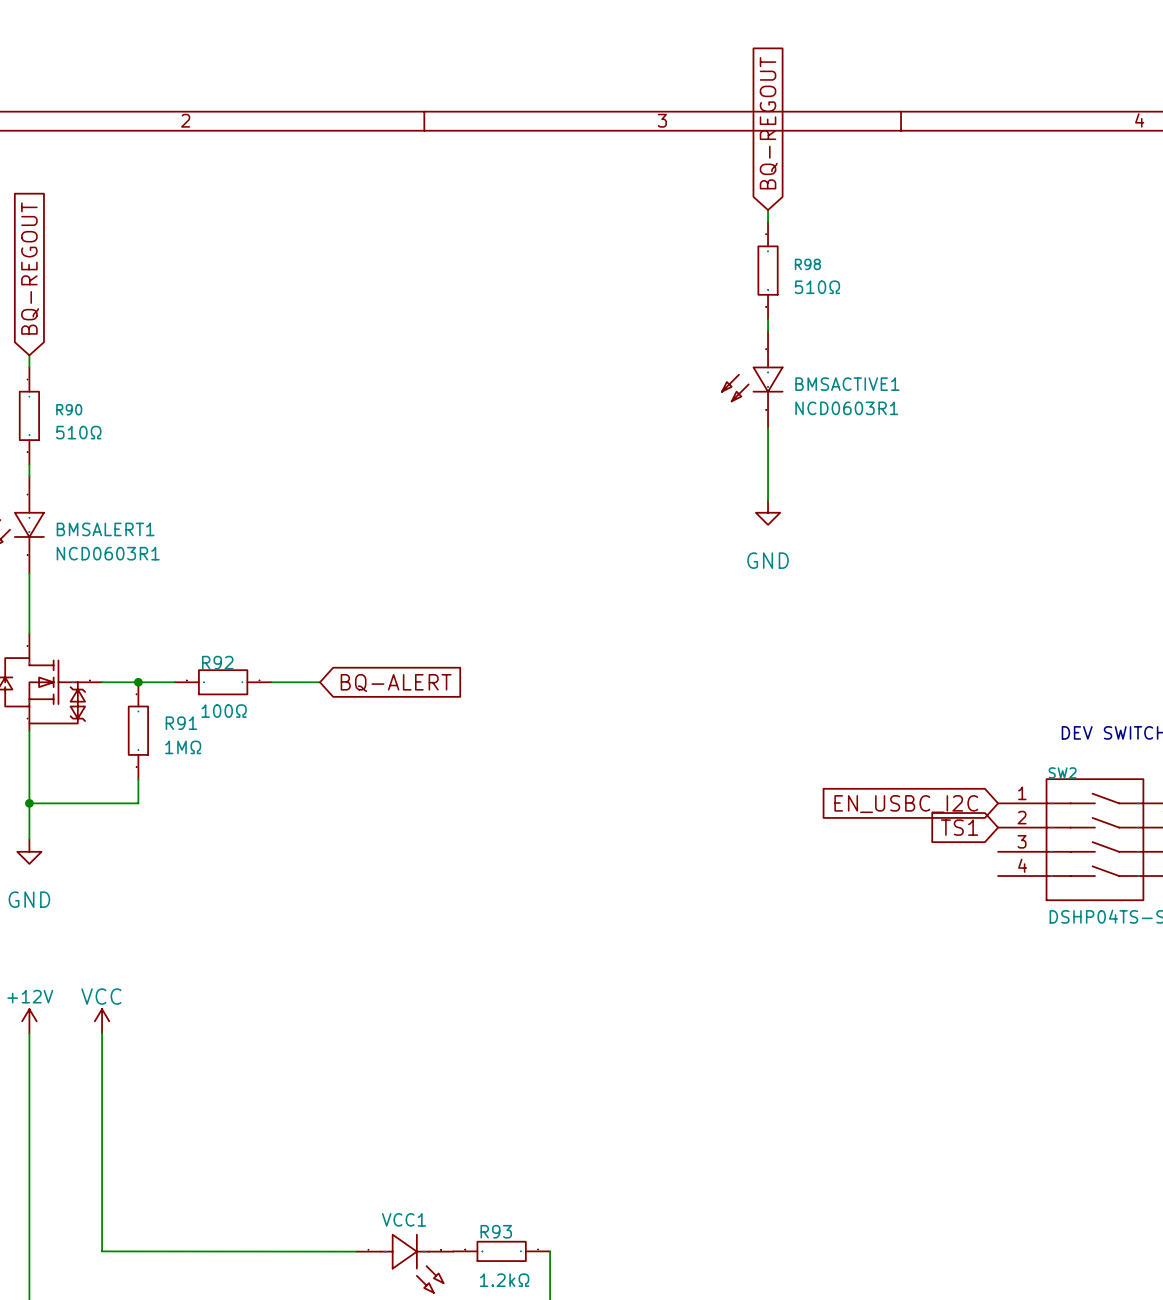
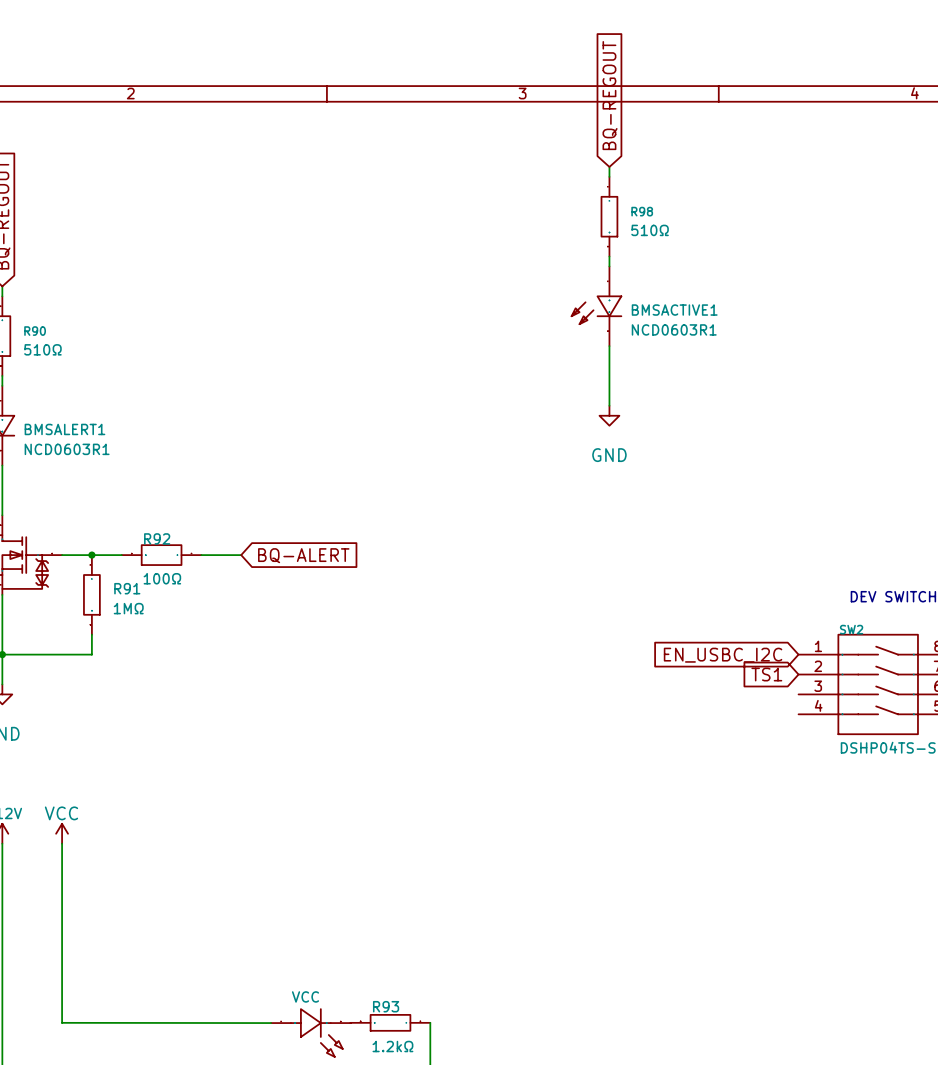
VCC1 name: VCC1 (404, 1219) -> VCC (305, 996)

